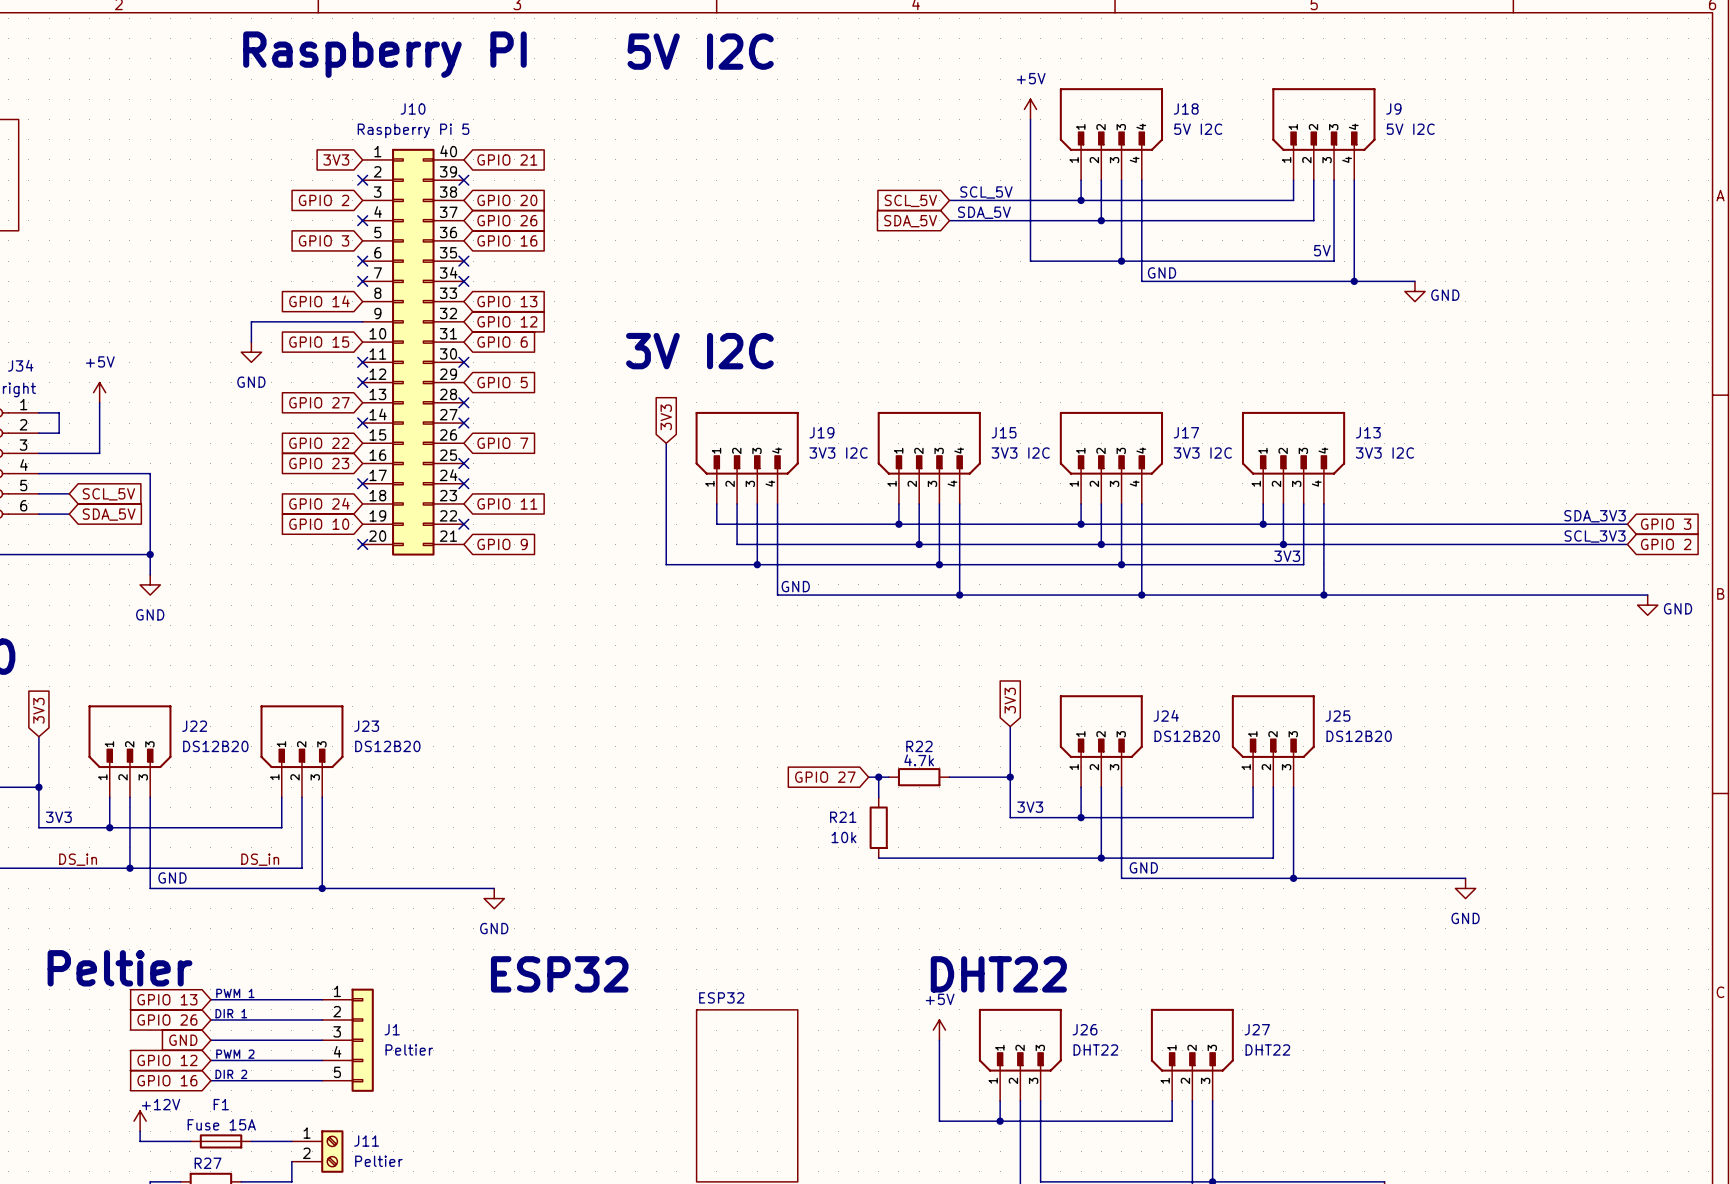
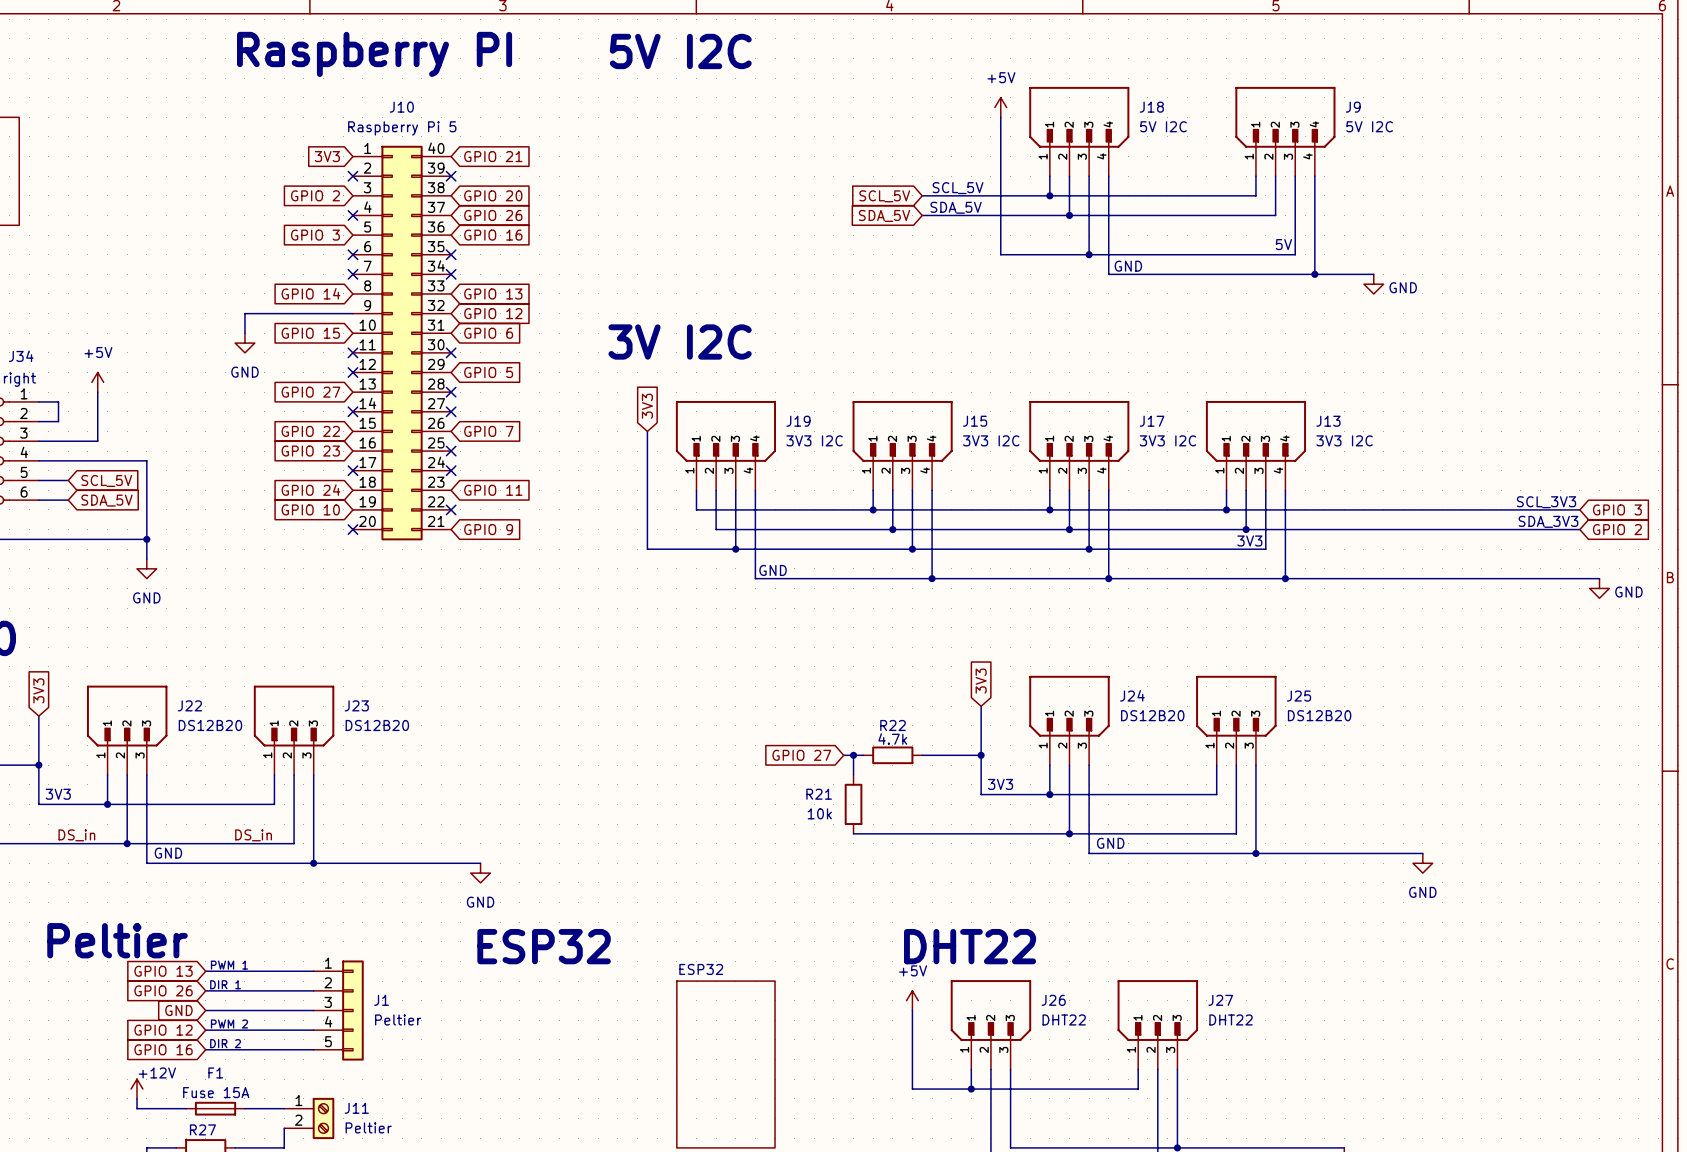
text: SDA_3V3 (1595, 516) -> SCL_3V3 (1546, 502)
text: SCL_3V3 (1595, 536) -> SDA_3V3 (1548, 521)

